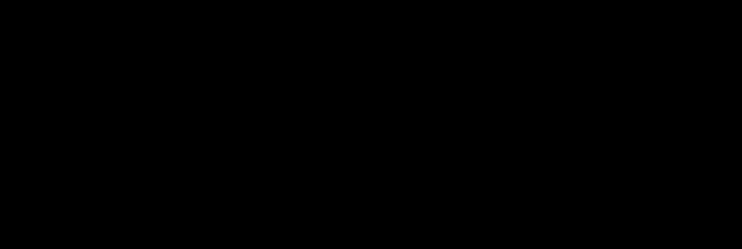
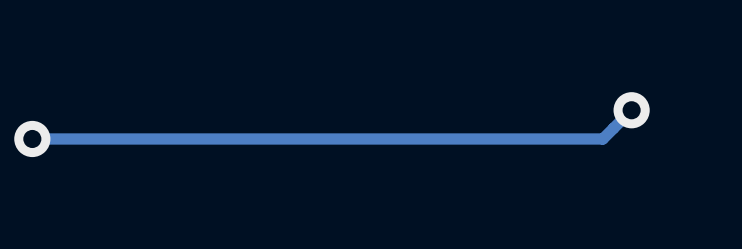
track: none -> (631, 110) (602, 138) (32, 138)
via: none -> (631, 110)
via: none -> (32, 138)

